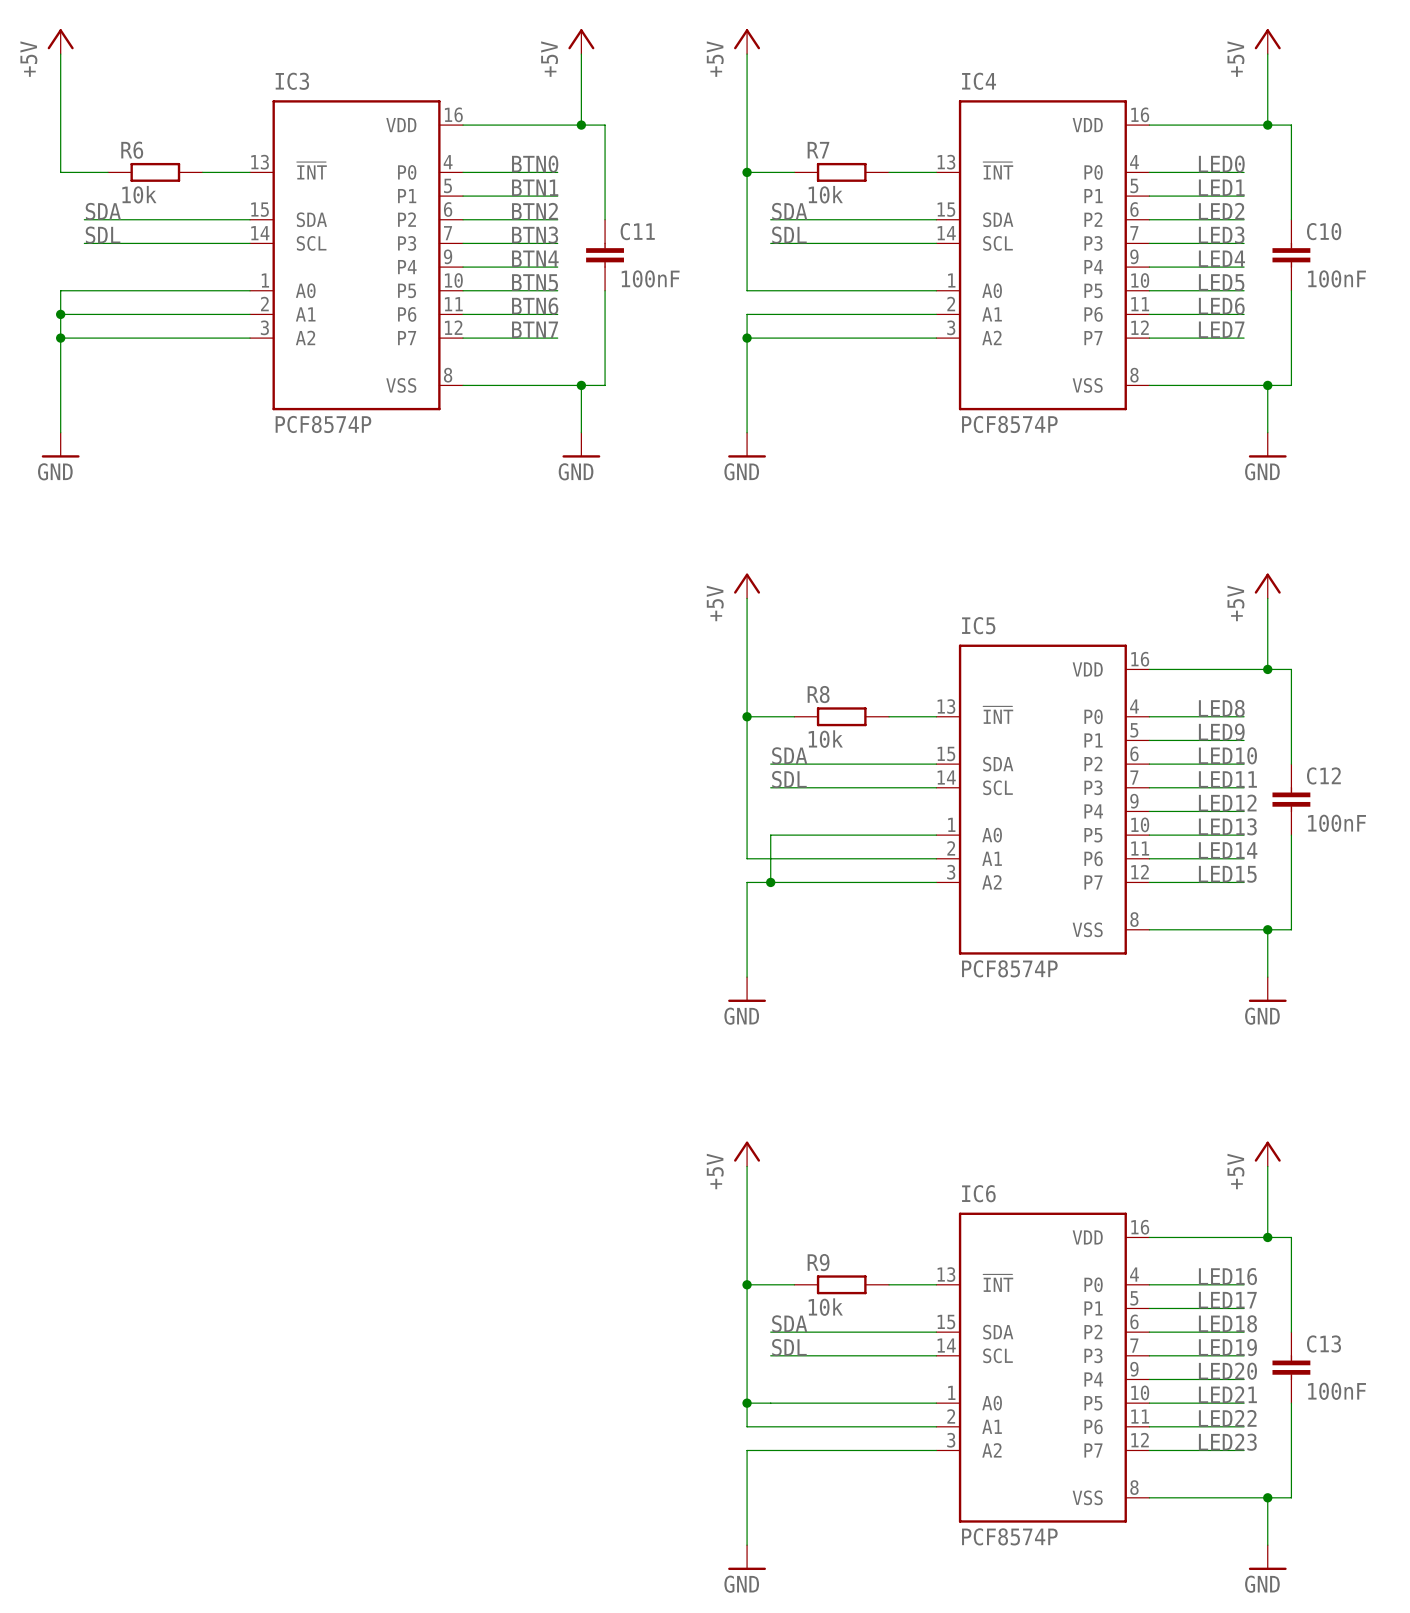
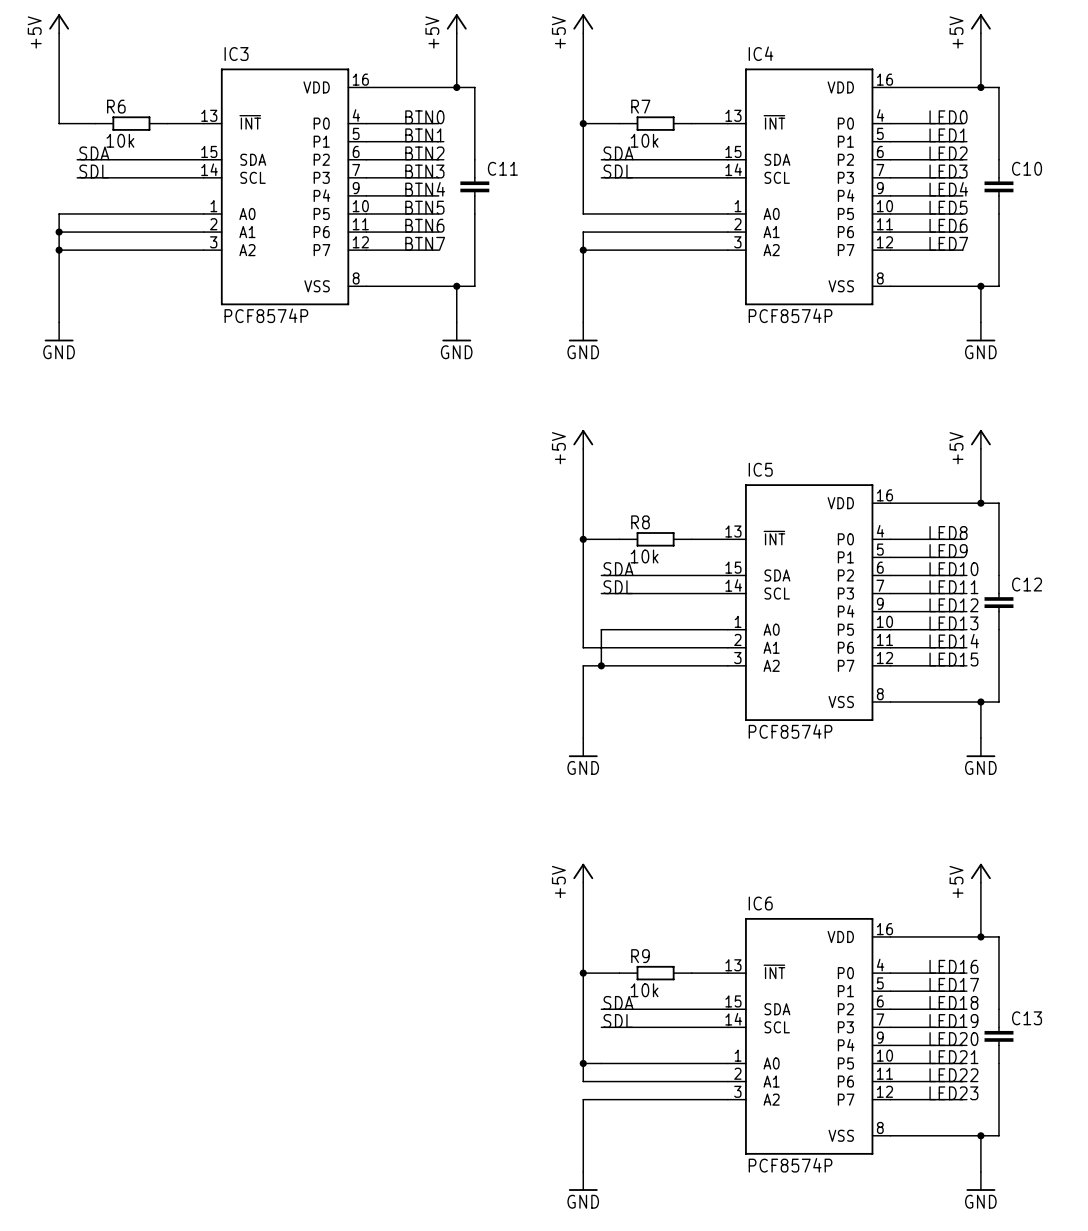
C11 value: 100nF (650, 278) -> none
C10 value: 100nF (1337, 278) -> none
C12 value: 100nF (1337, 823) -> none
C13 value: 100nF (1337, 1391) -> none

